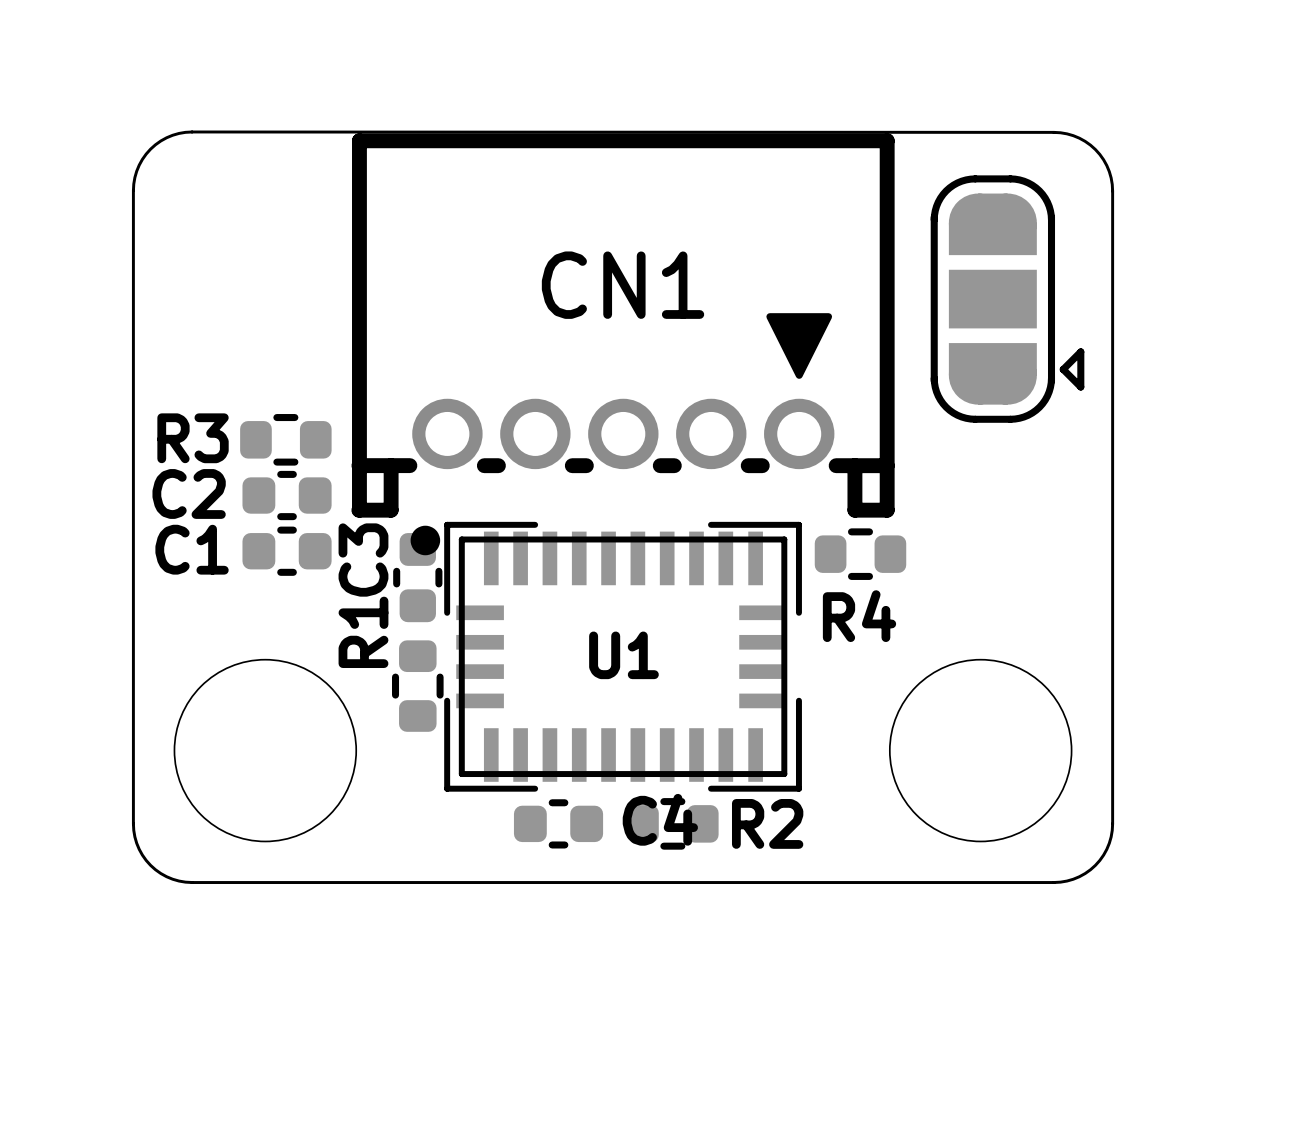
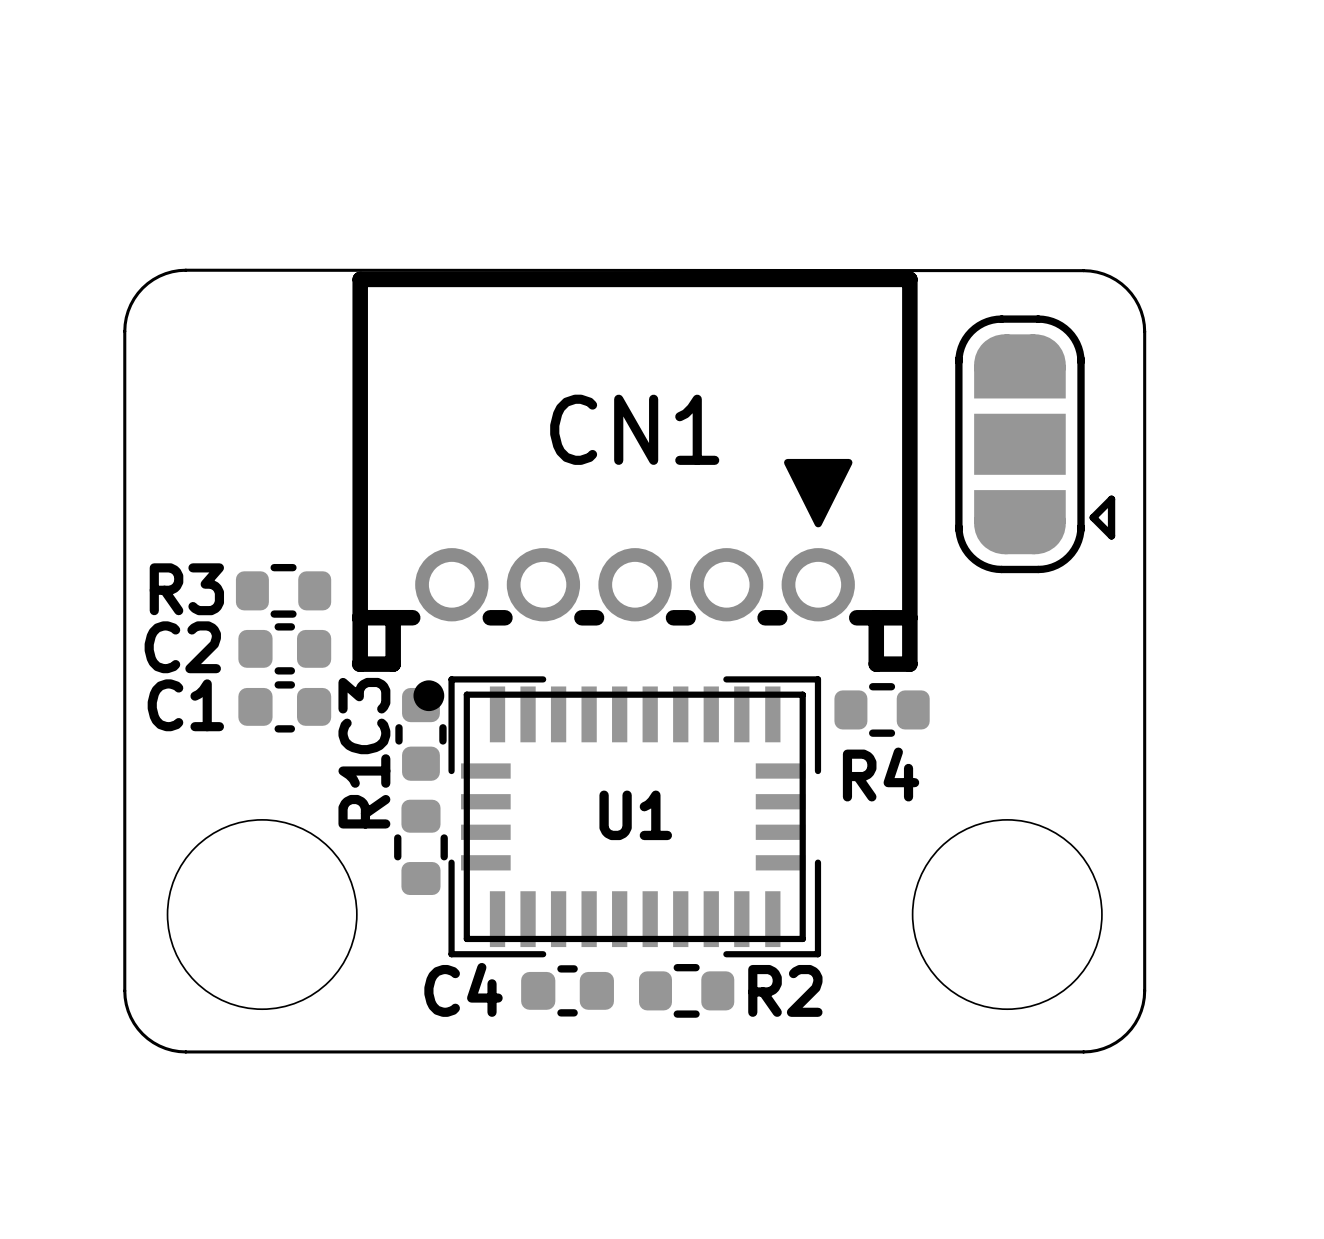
C4 name position: C4 (660, 819) -> C4 (463, 989)

